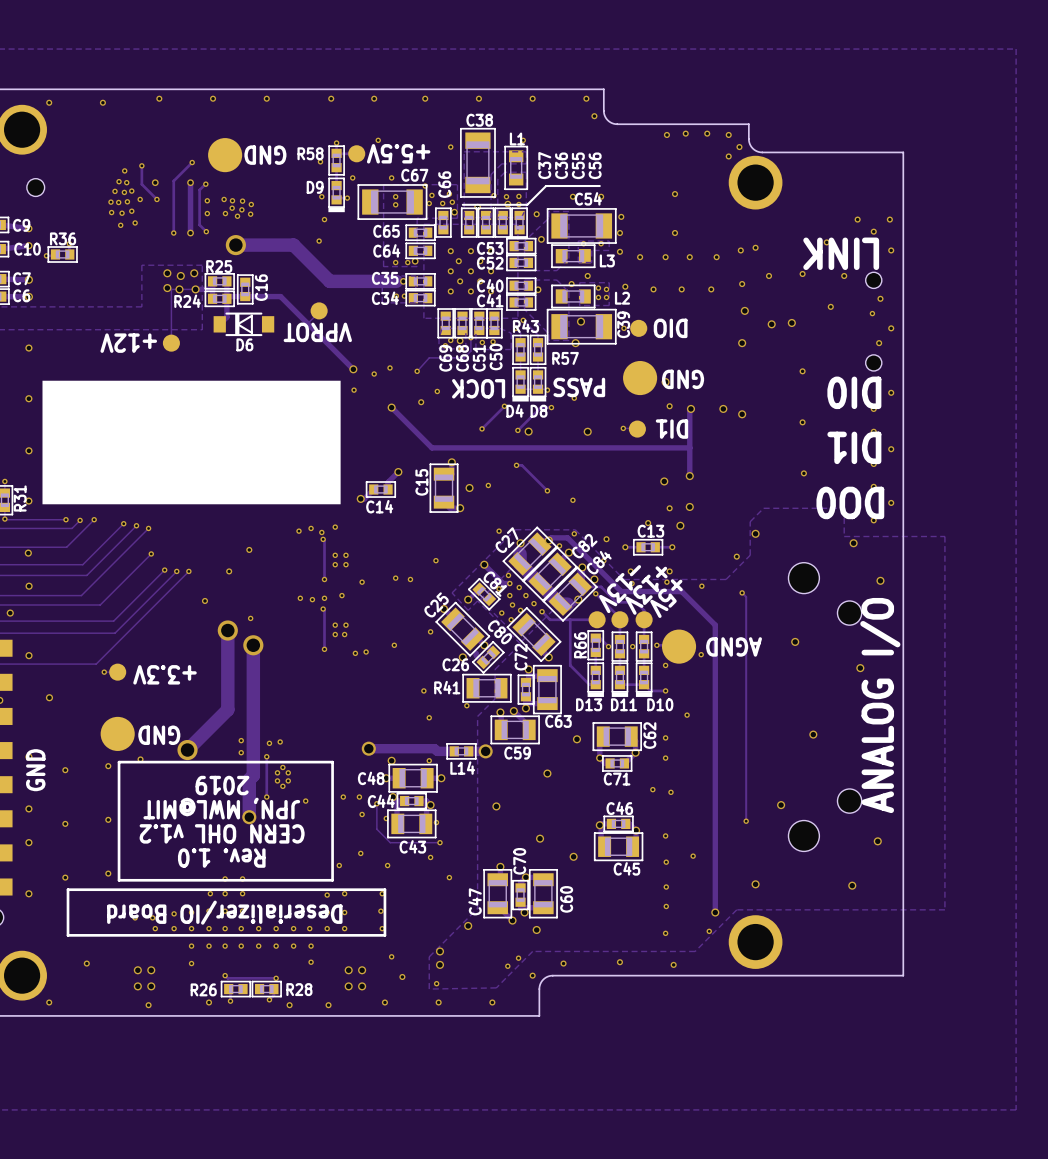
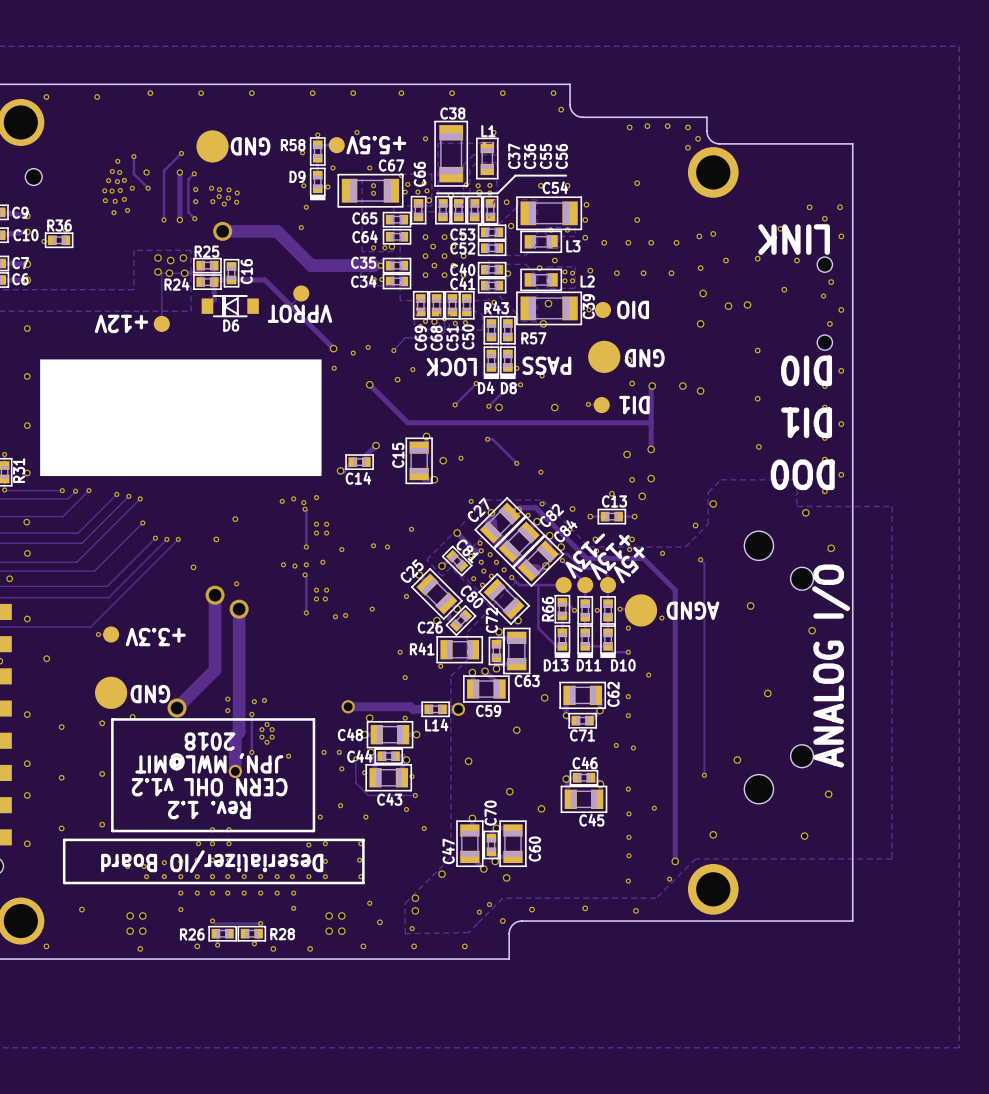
text: GND (35, 770) -> none
text: 2019 (222, 785) -> 2018 (210, 741)
text: Rev. 1.0 (221, 858) -> Rev. 1.2 (209, 810)

